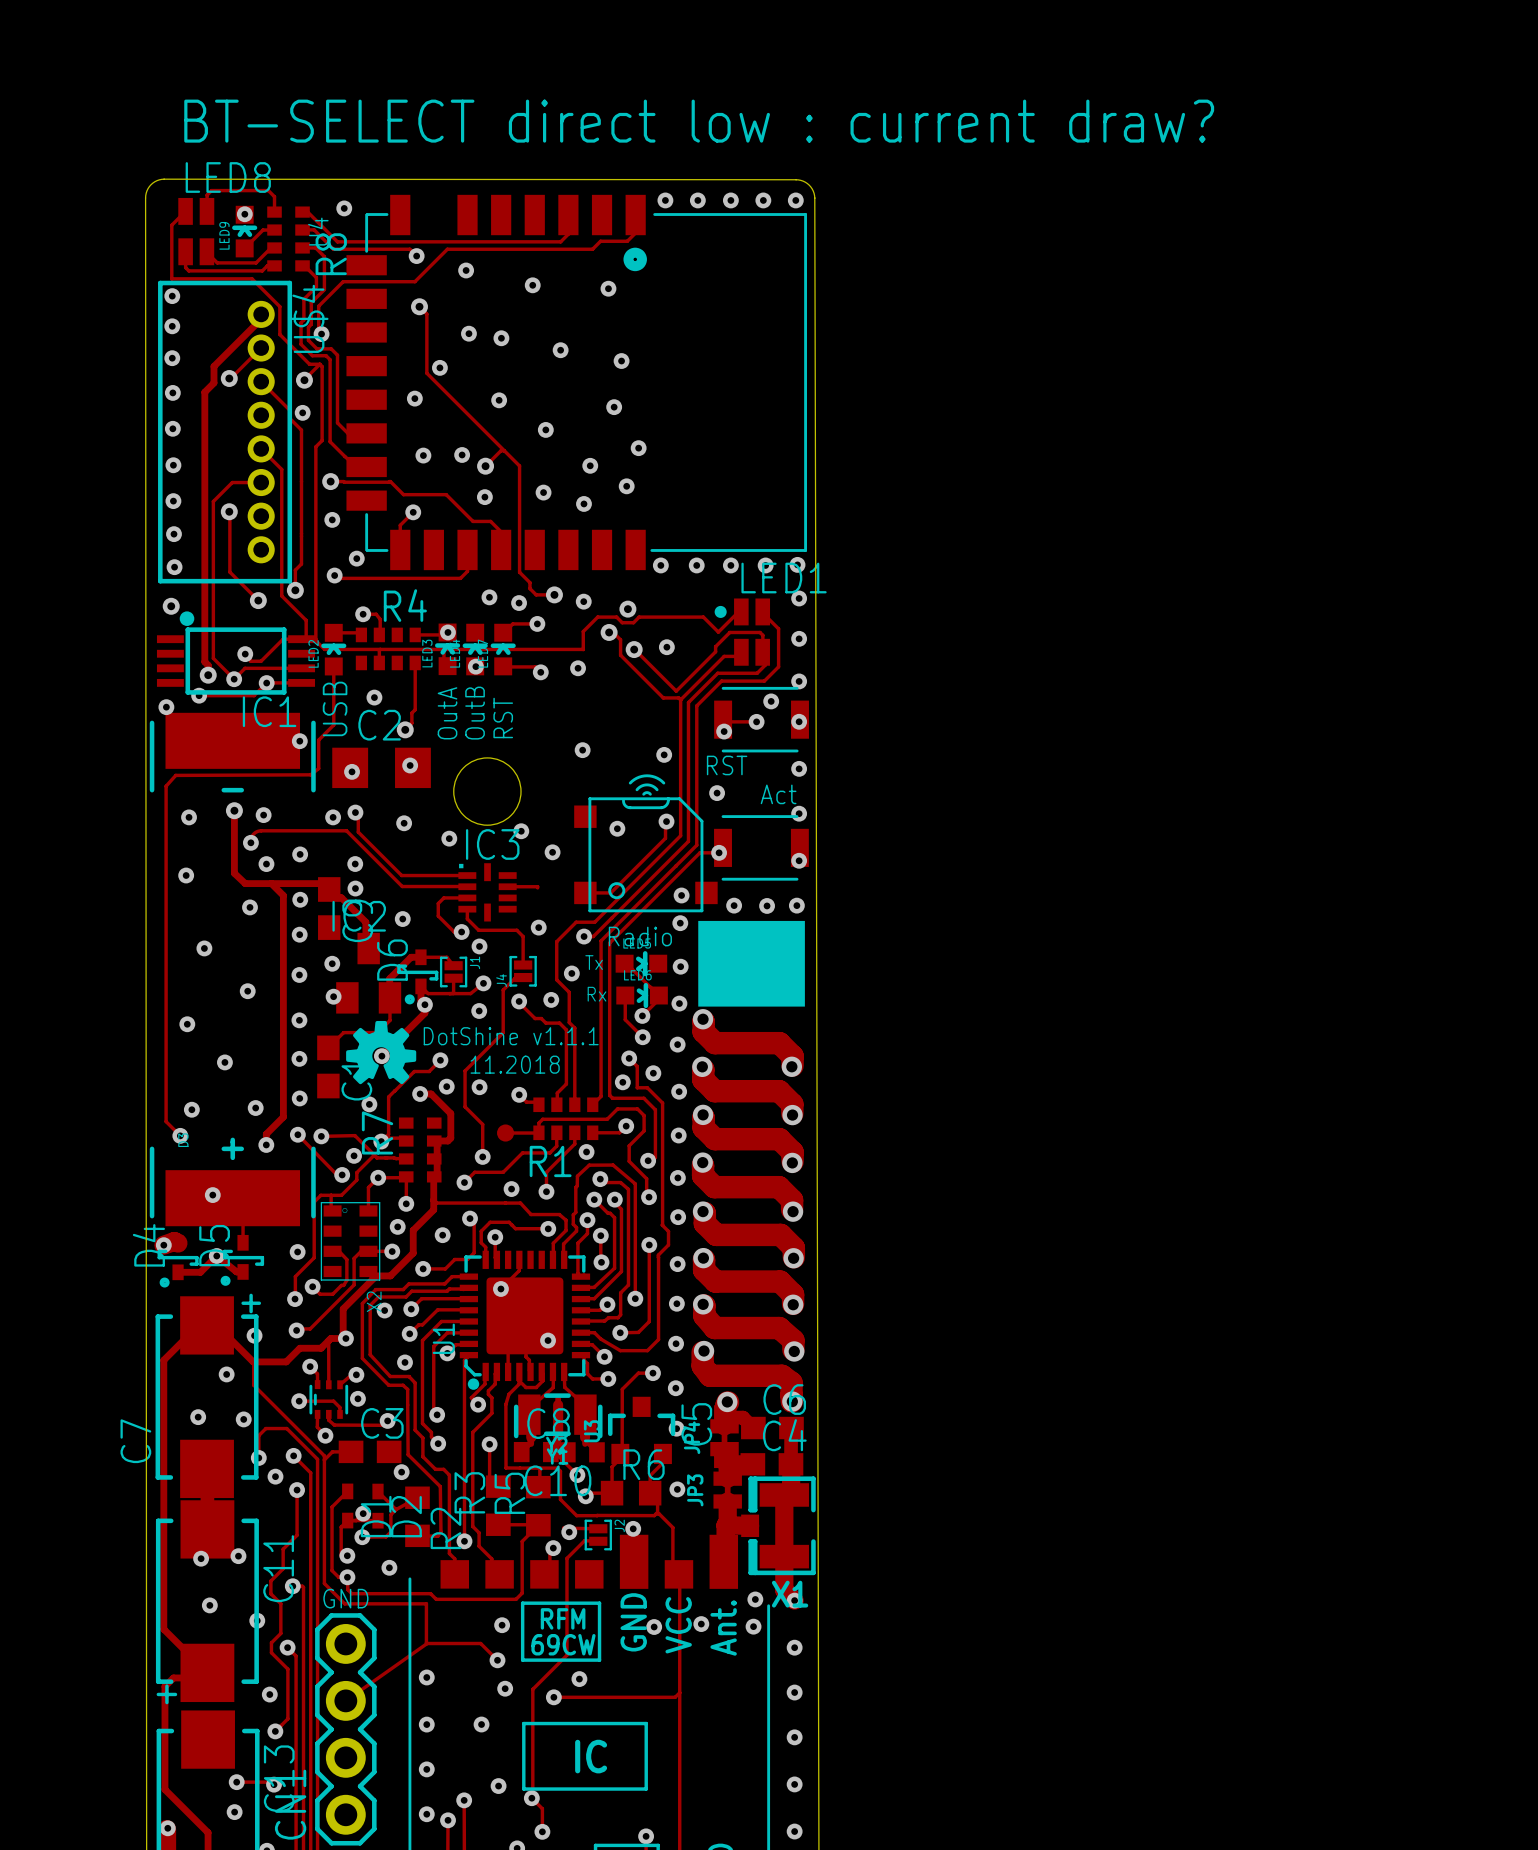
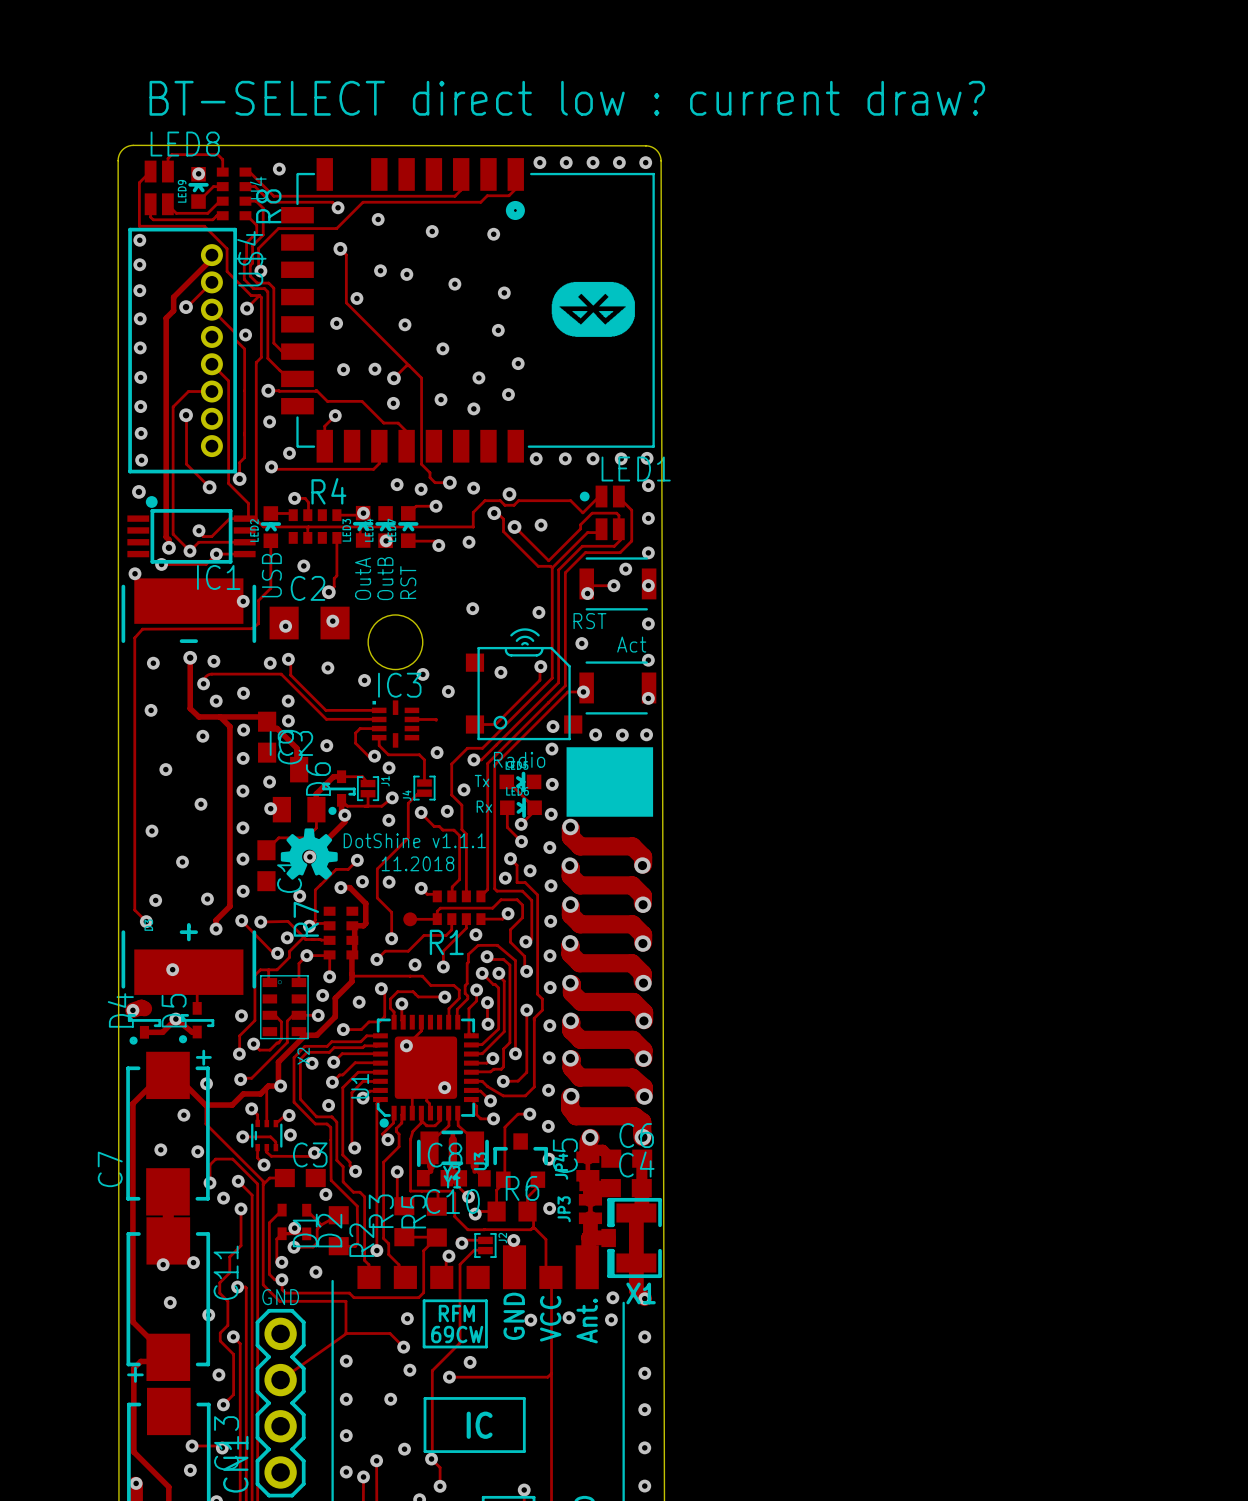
drawing: none -> [551, 281, 635, 337]

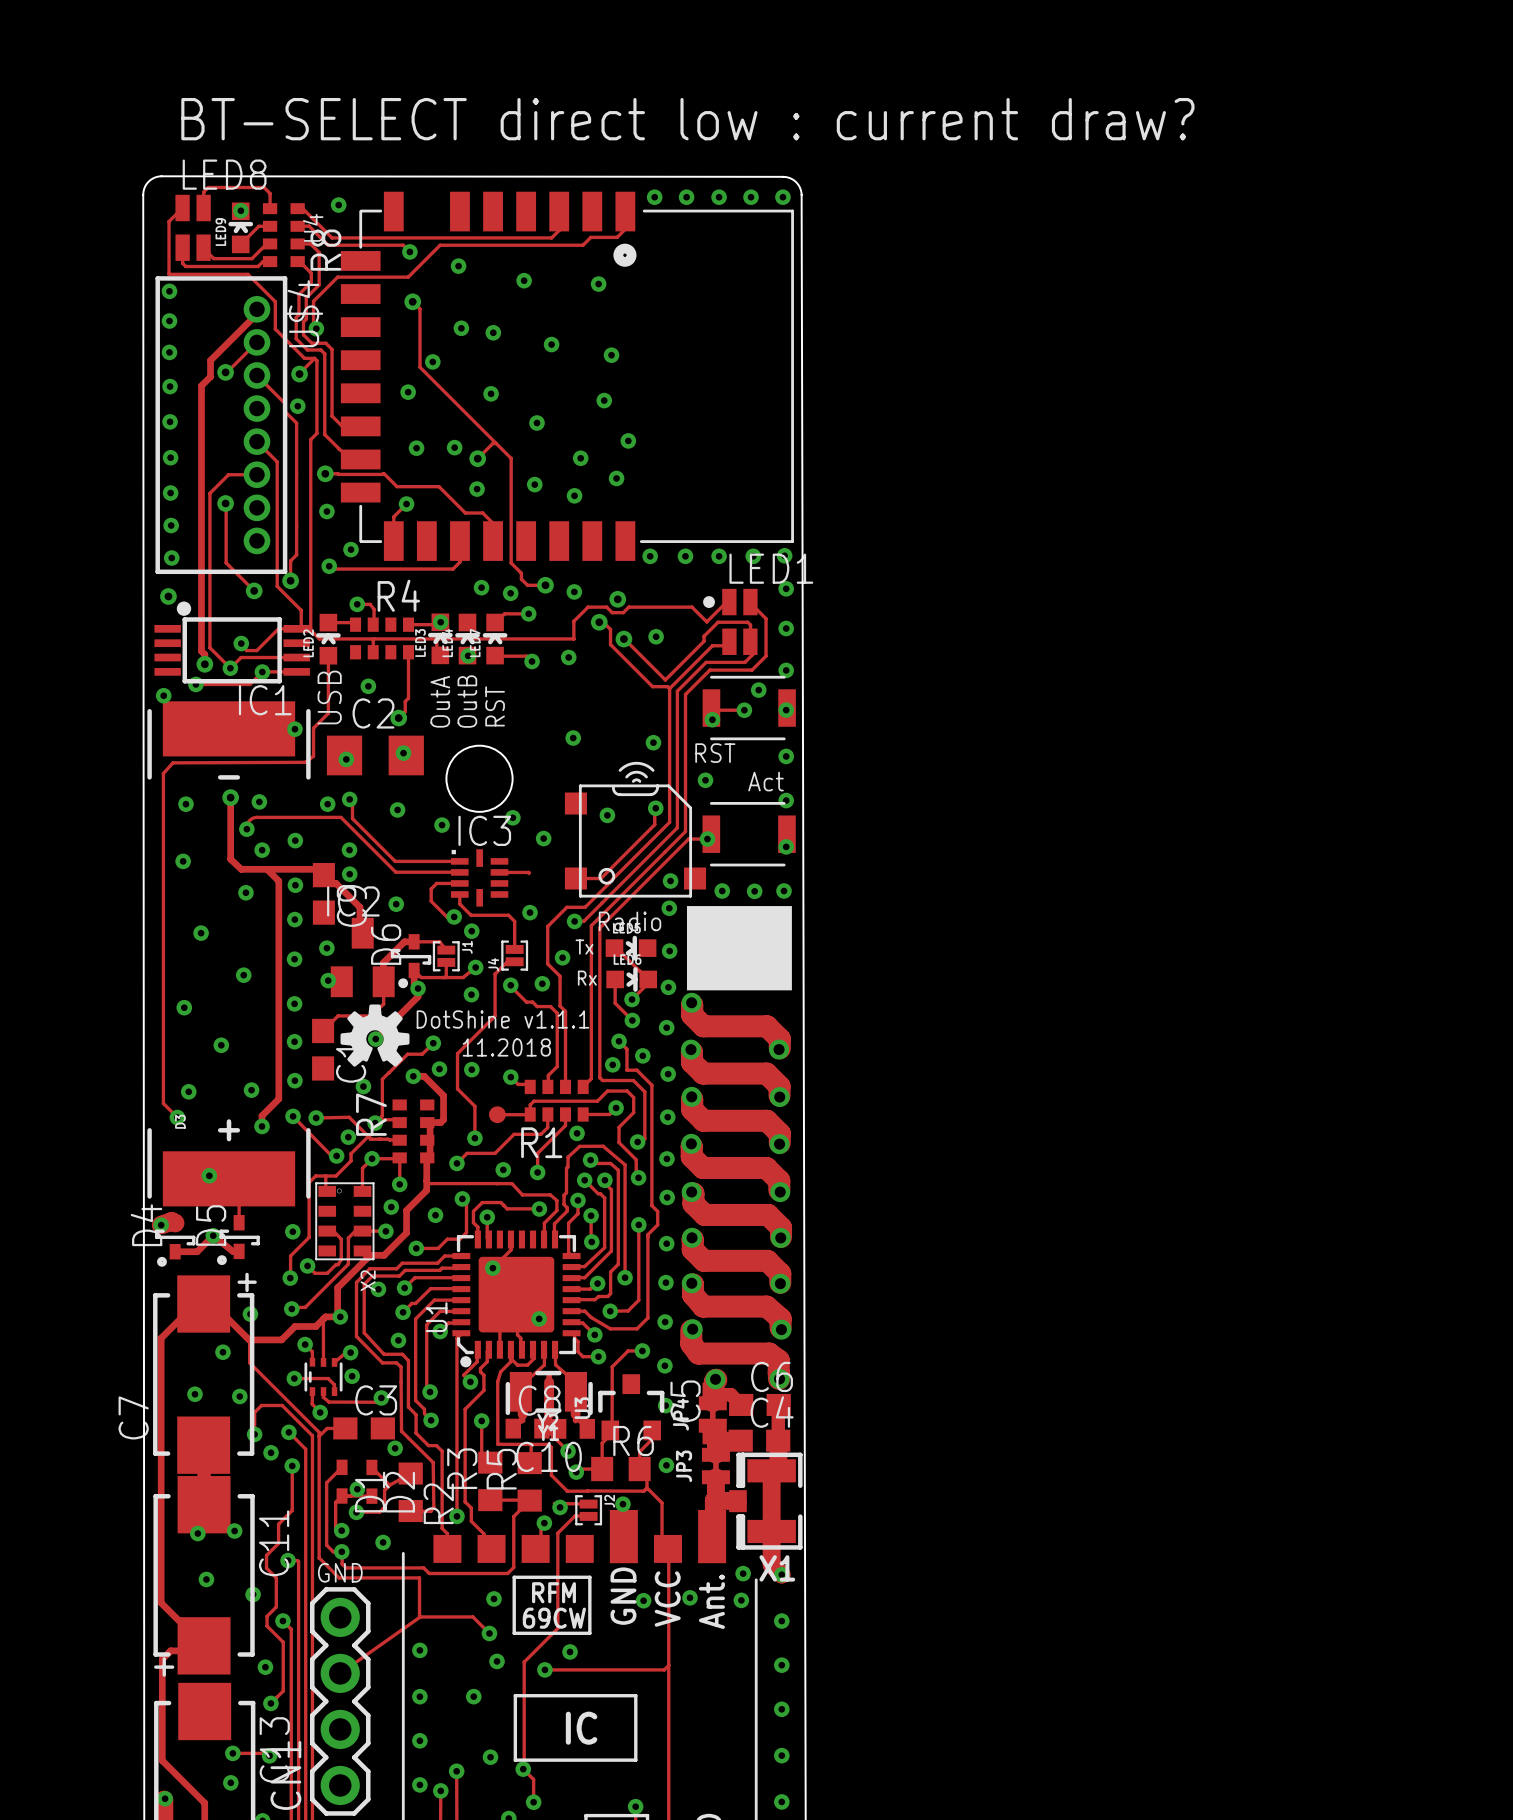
drawing: [551, 281, 635, 337] -> none

